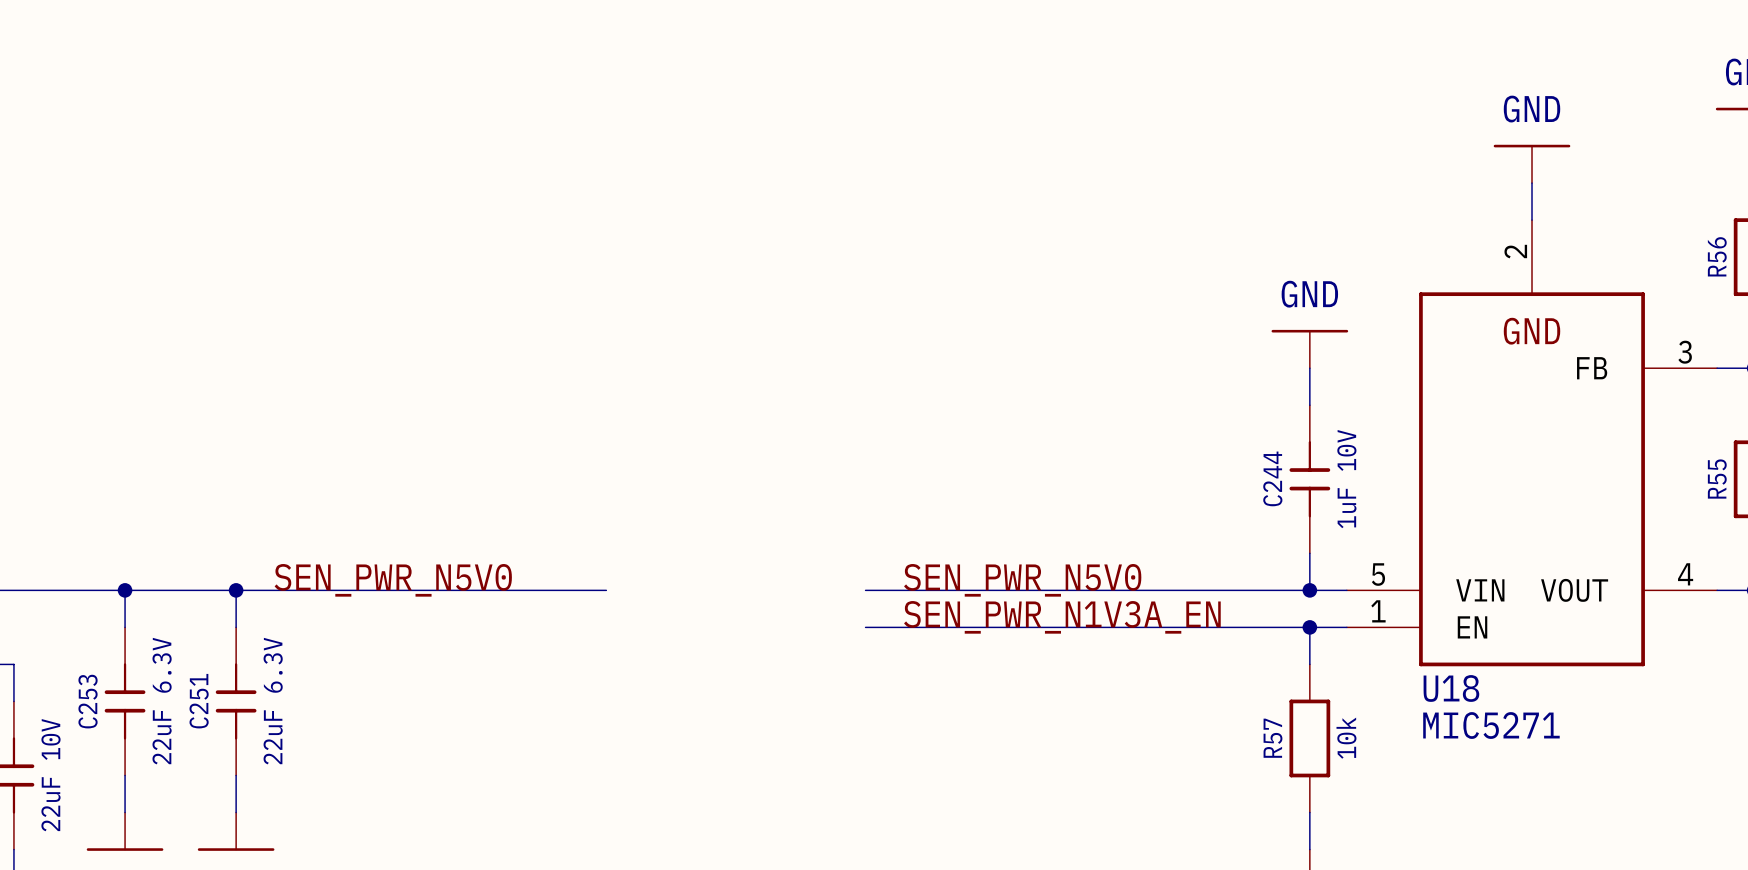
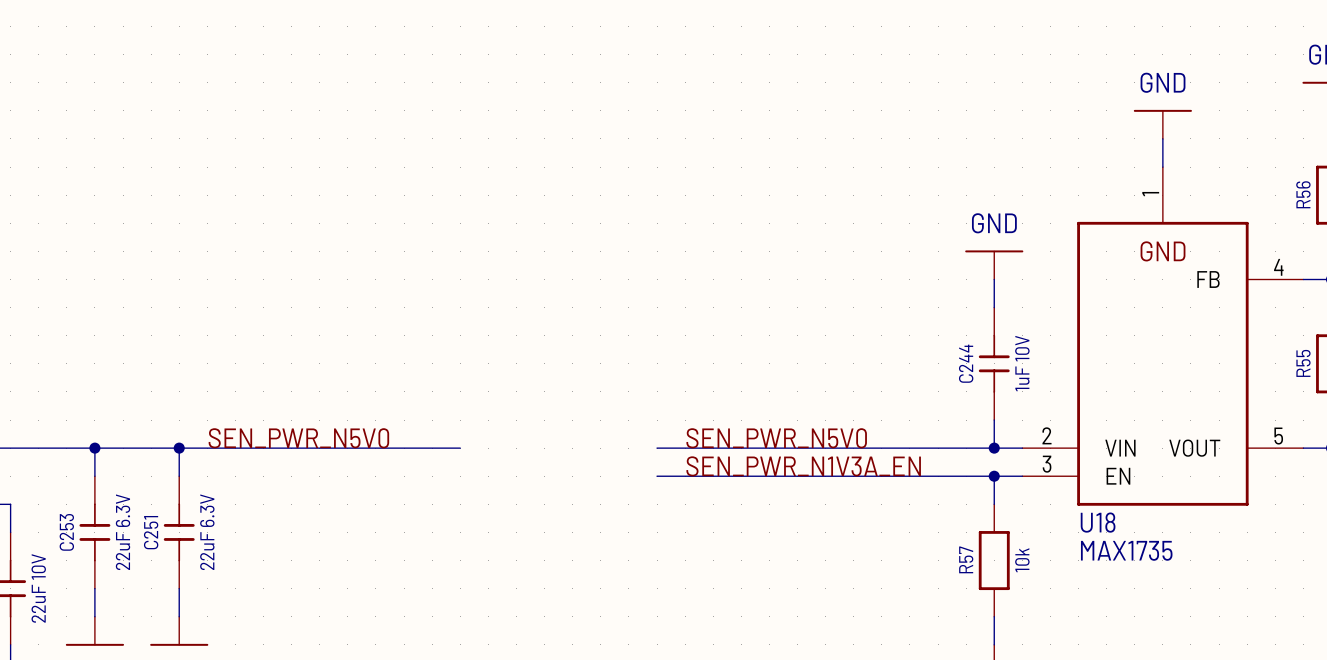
U18 pin number: 2 (1515, 251) -> 1 (1150, 194)
U18 pin number: 3 (1685, 352) -> 4 (1278, 267)
U18 pin number: 5 (1378, 574) -> 2 (1046, 435)
U18 pin number: 4 (1685, 574) -> 5 (1278, 436)
U18 pin number: 1 (1378, 611) -> 3 (1047, 464)
U18 value: MIC5271 (1491, 725) -> MAX1735 (1126, 550)

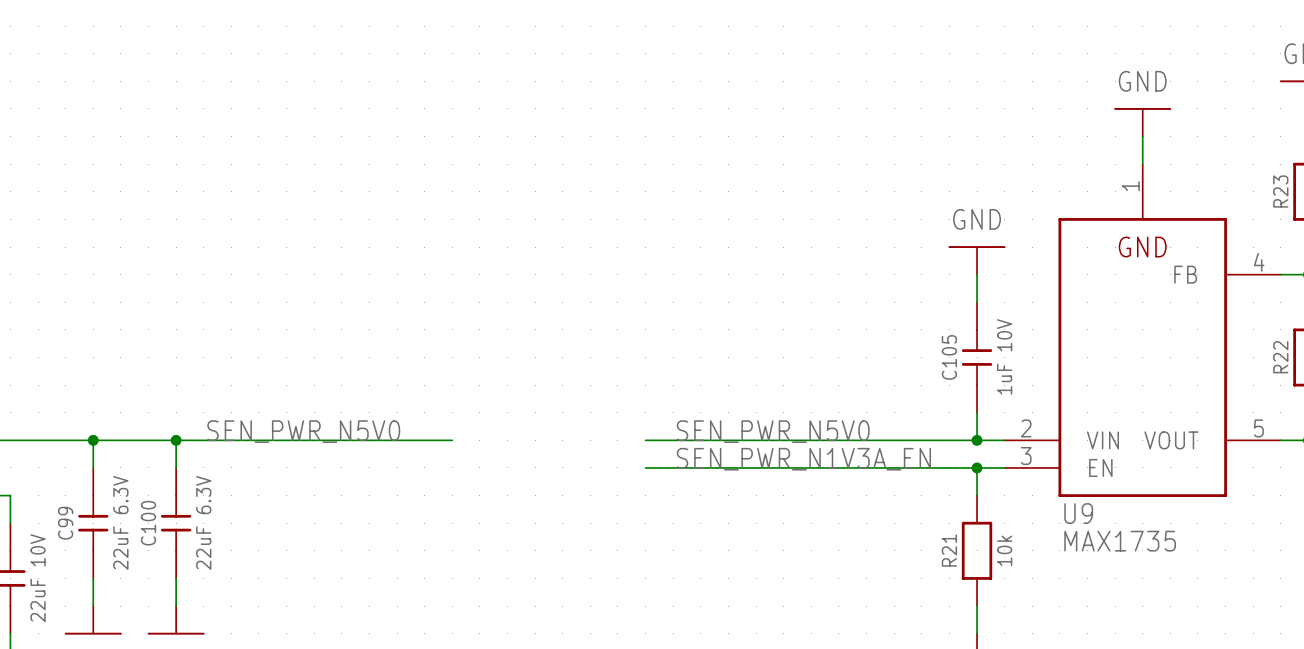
R56 name: R56 (1303, 194) -> R23 (1280, 191)
C244 name: C244 (966, 363) -> C105 (949, 357)
R55 name: R55 (1303, 363) -> R22 (1280, 357)
U18 name: U18 (1098, 522) -> U9 (1078, 513)
C253 name: C253 (66, 532) -> C99 (65, 523)
C251 name: C251 (151, 532) -> C100 (148, 523)
R57 name: R57 (966, 559) -> R21 (949, 550)

